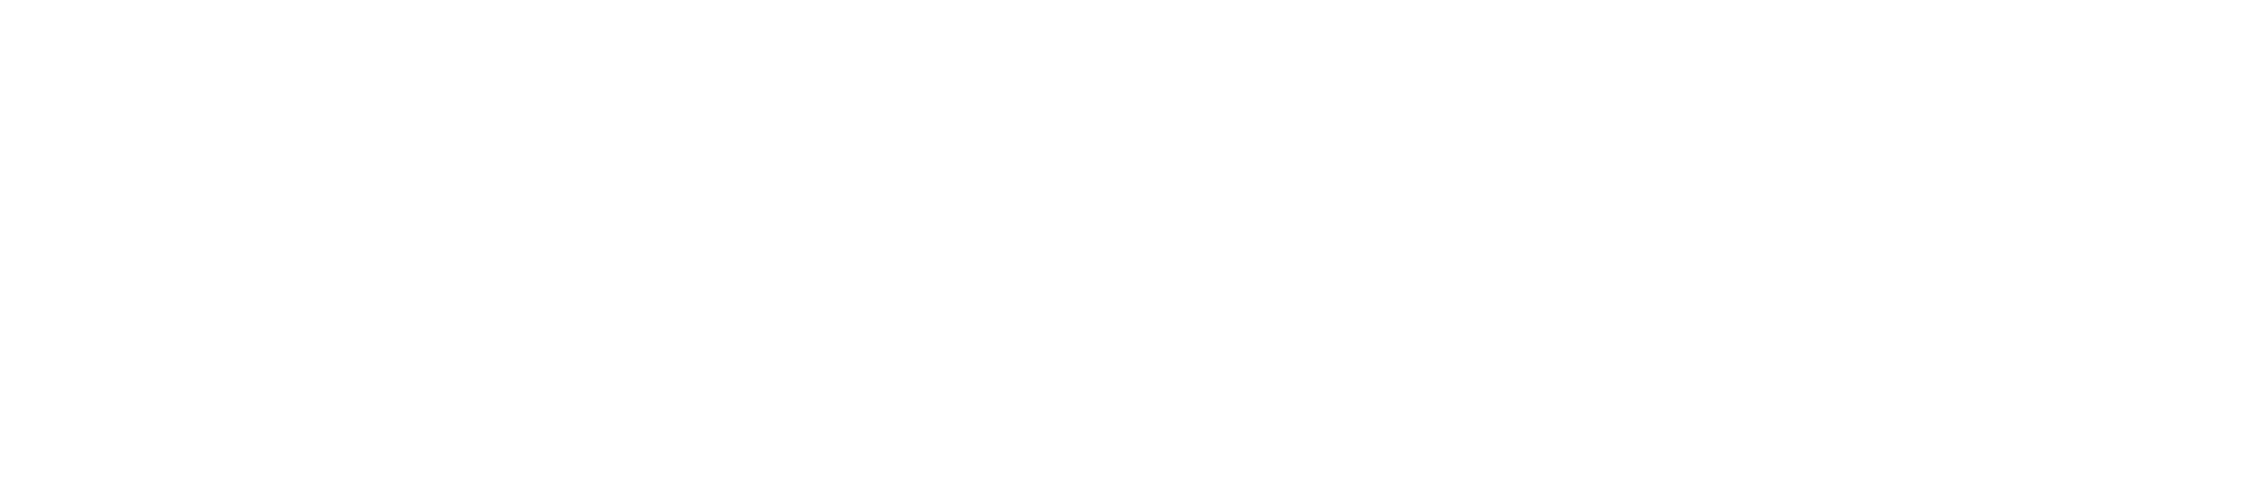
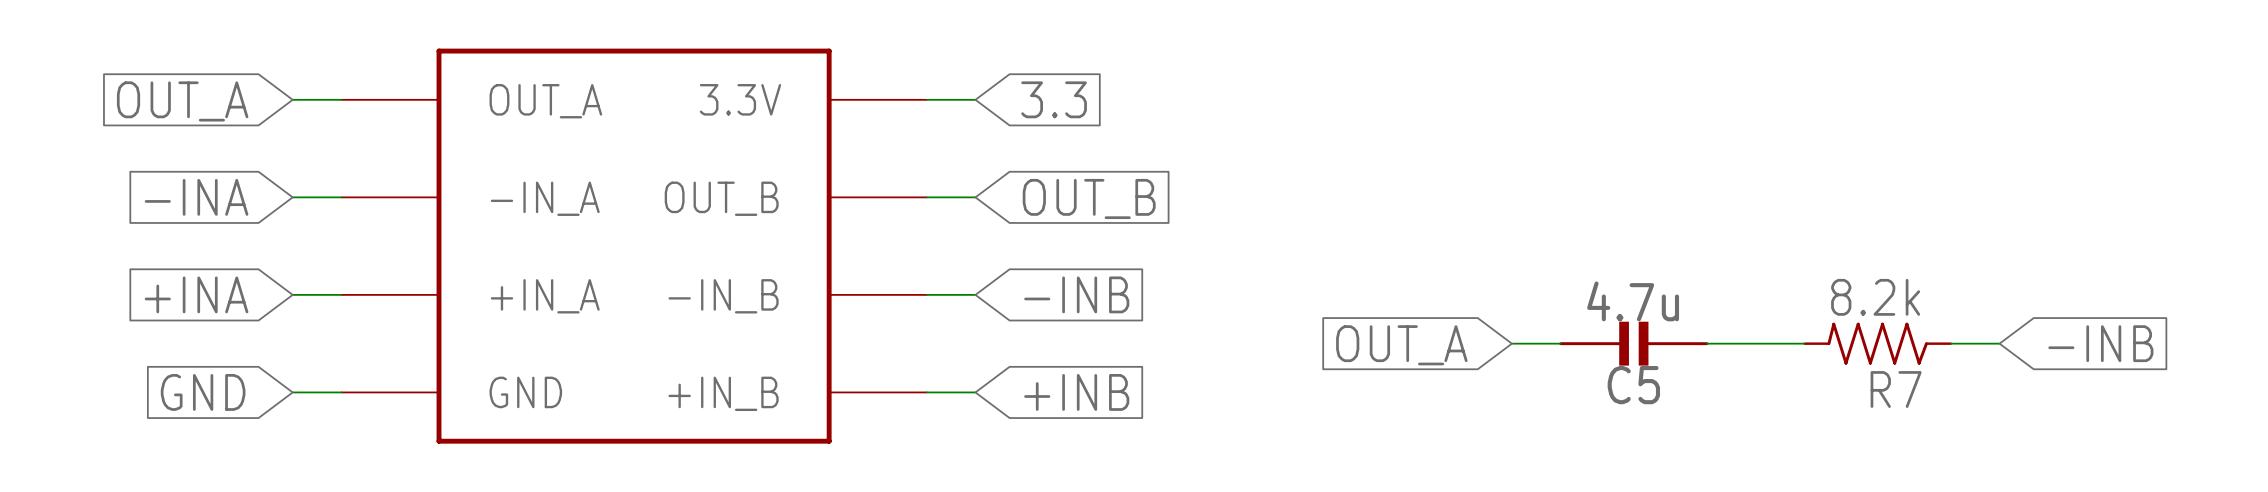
wire: none -> (292, 99) (341, 99)
wire: none -> (926, 99) (975, 99)
global label: none -> 3.3 (1054, 99)
global label: none -> OUT_A (182, 101)
global label: none -> -INA (196, 197)
wire: none -> (292, 197) (341, 197)
wire: none -> (926, 197) (975, 197)
global label: none -> OUT_B (1089, 198)
part: none -> (634, 246)
global label: none -> +INA (196, 294)
wire: none -> (292, 294) (341, 294)
wire: none -> (926, 294) (975, 294)
global label: none -> -INB (1076, 294)
wire: none -> (1511, 343) (1560, 343)
C5: none -> 4.7u (1633, 343)
wire: none -> (1706, 343) (1804, 343)
R7: none -> 8.2k (1877, 343)
wire: none -> (1950, 343) (1999, 343)
global label: none -> -INB (2100, 343)
global label: none -> OUT_A (1401, 345)
global label: none -> GND (203, 392)
wire: none -> (292, 392) (341, 392)
wire: none -> (926, 392) (975, 392)
global label: none -> +INB (1076, 392)

